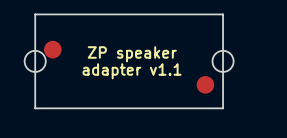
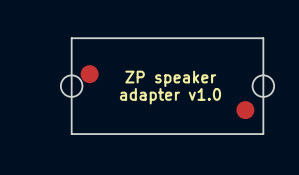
text: adapter v1.1 (132, 71) -> adapter v1.0 (170, 96)

